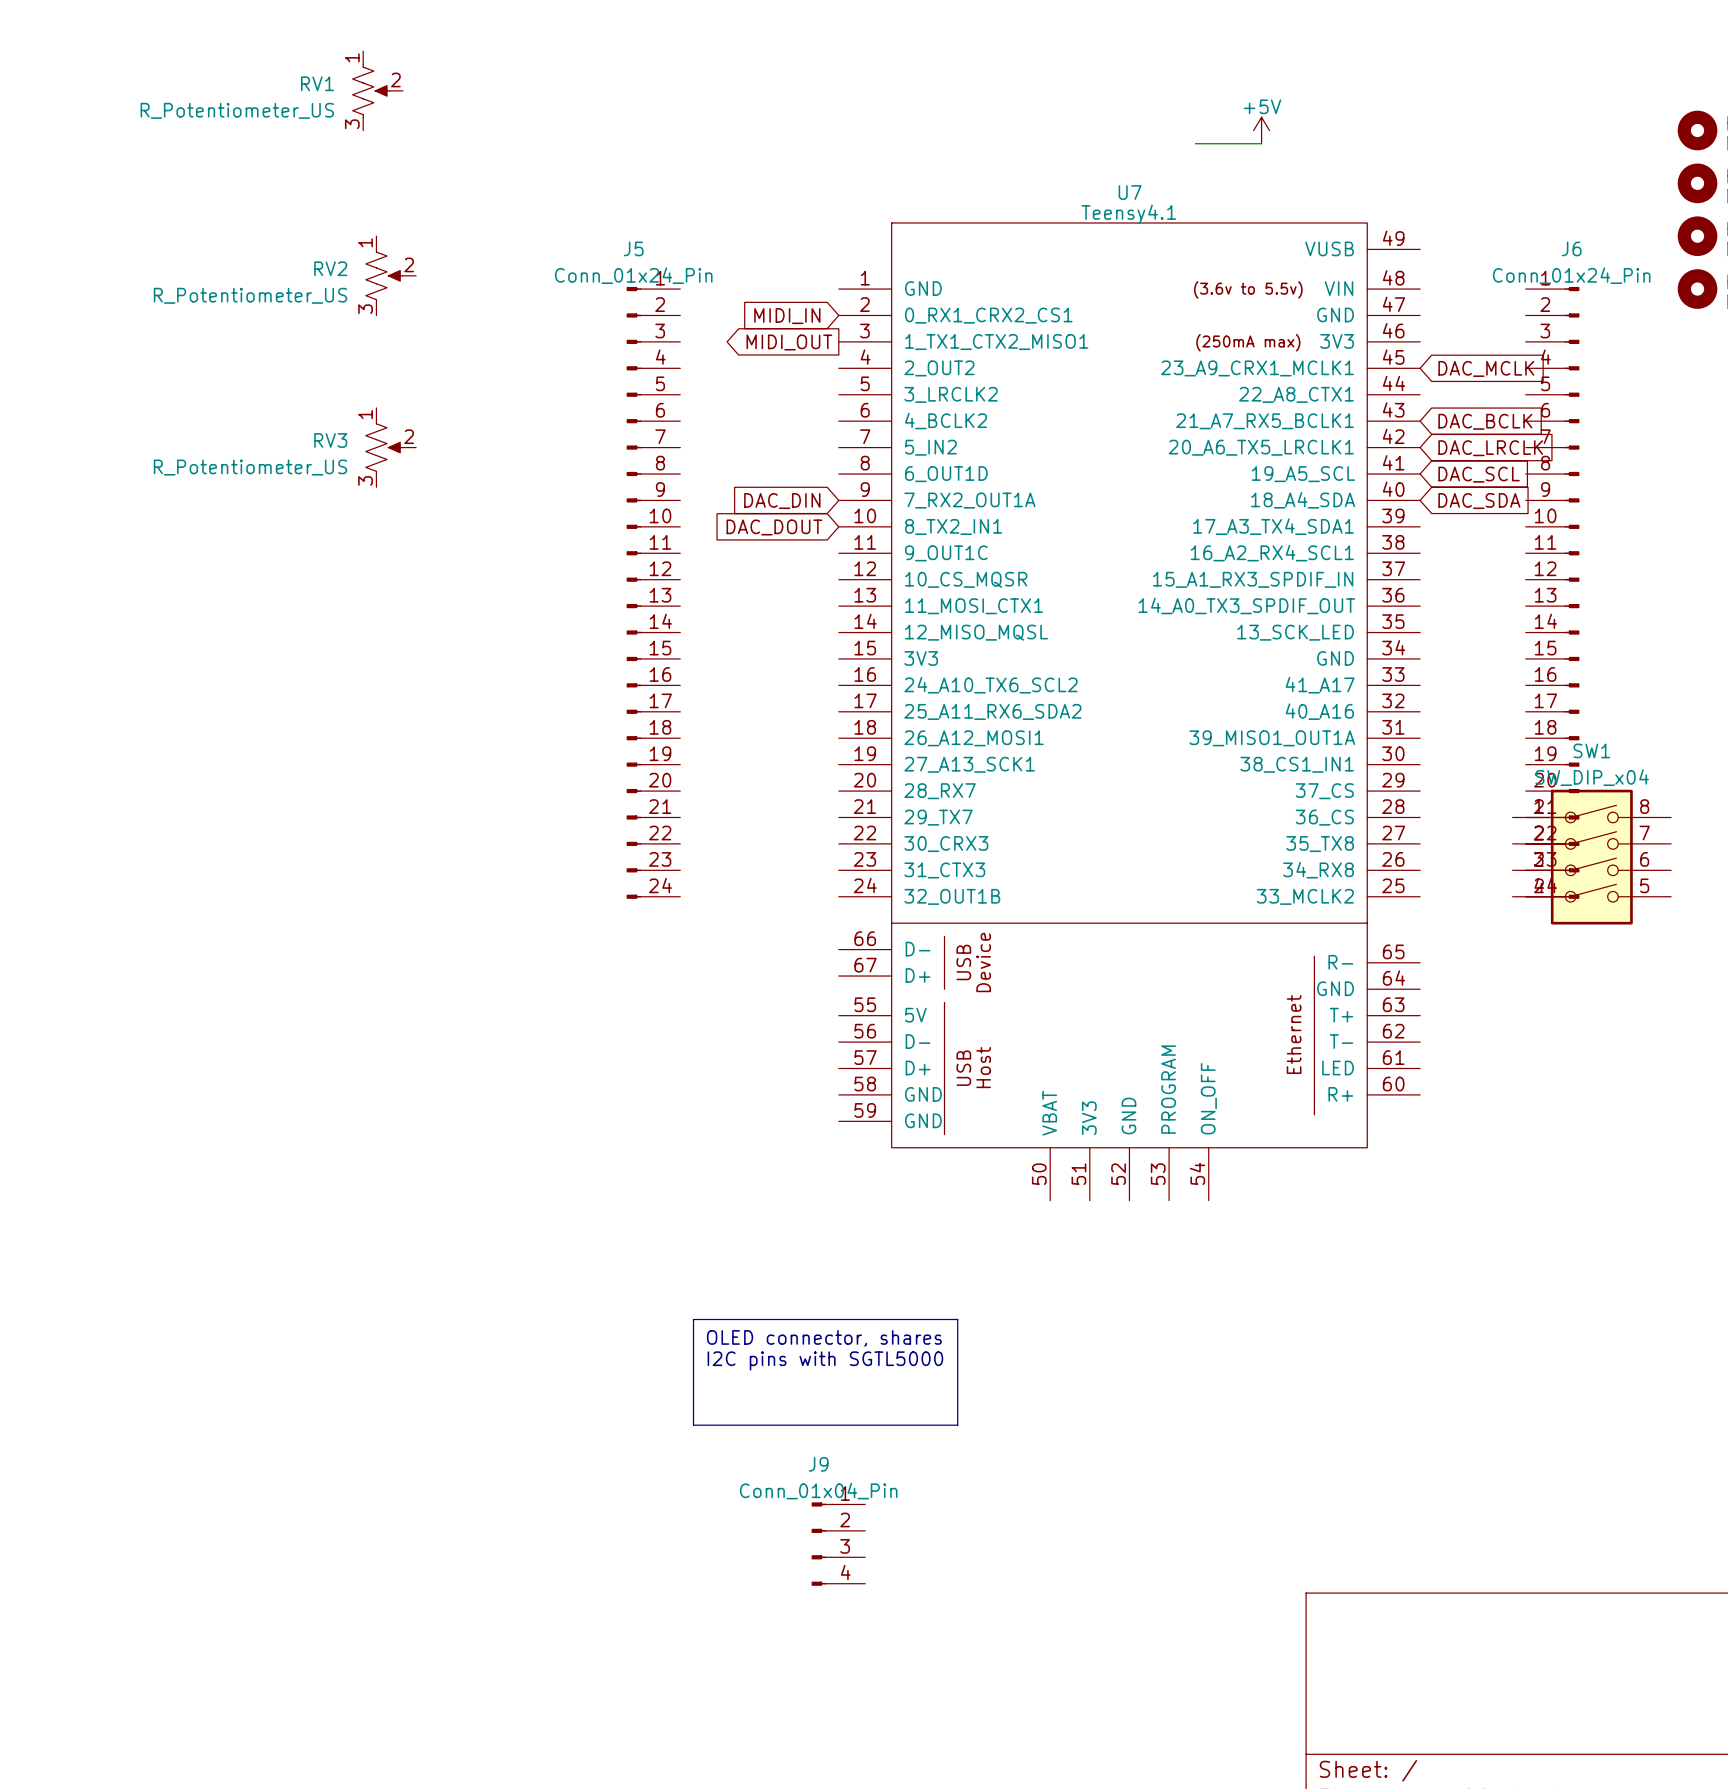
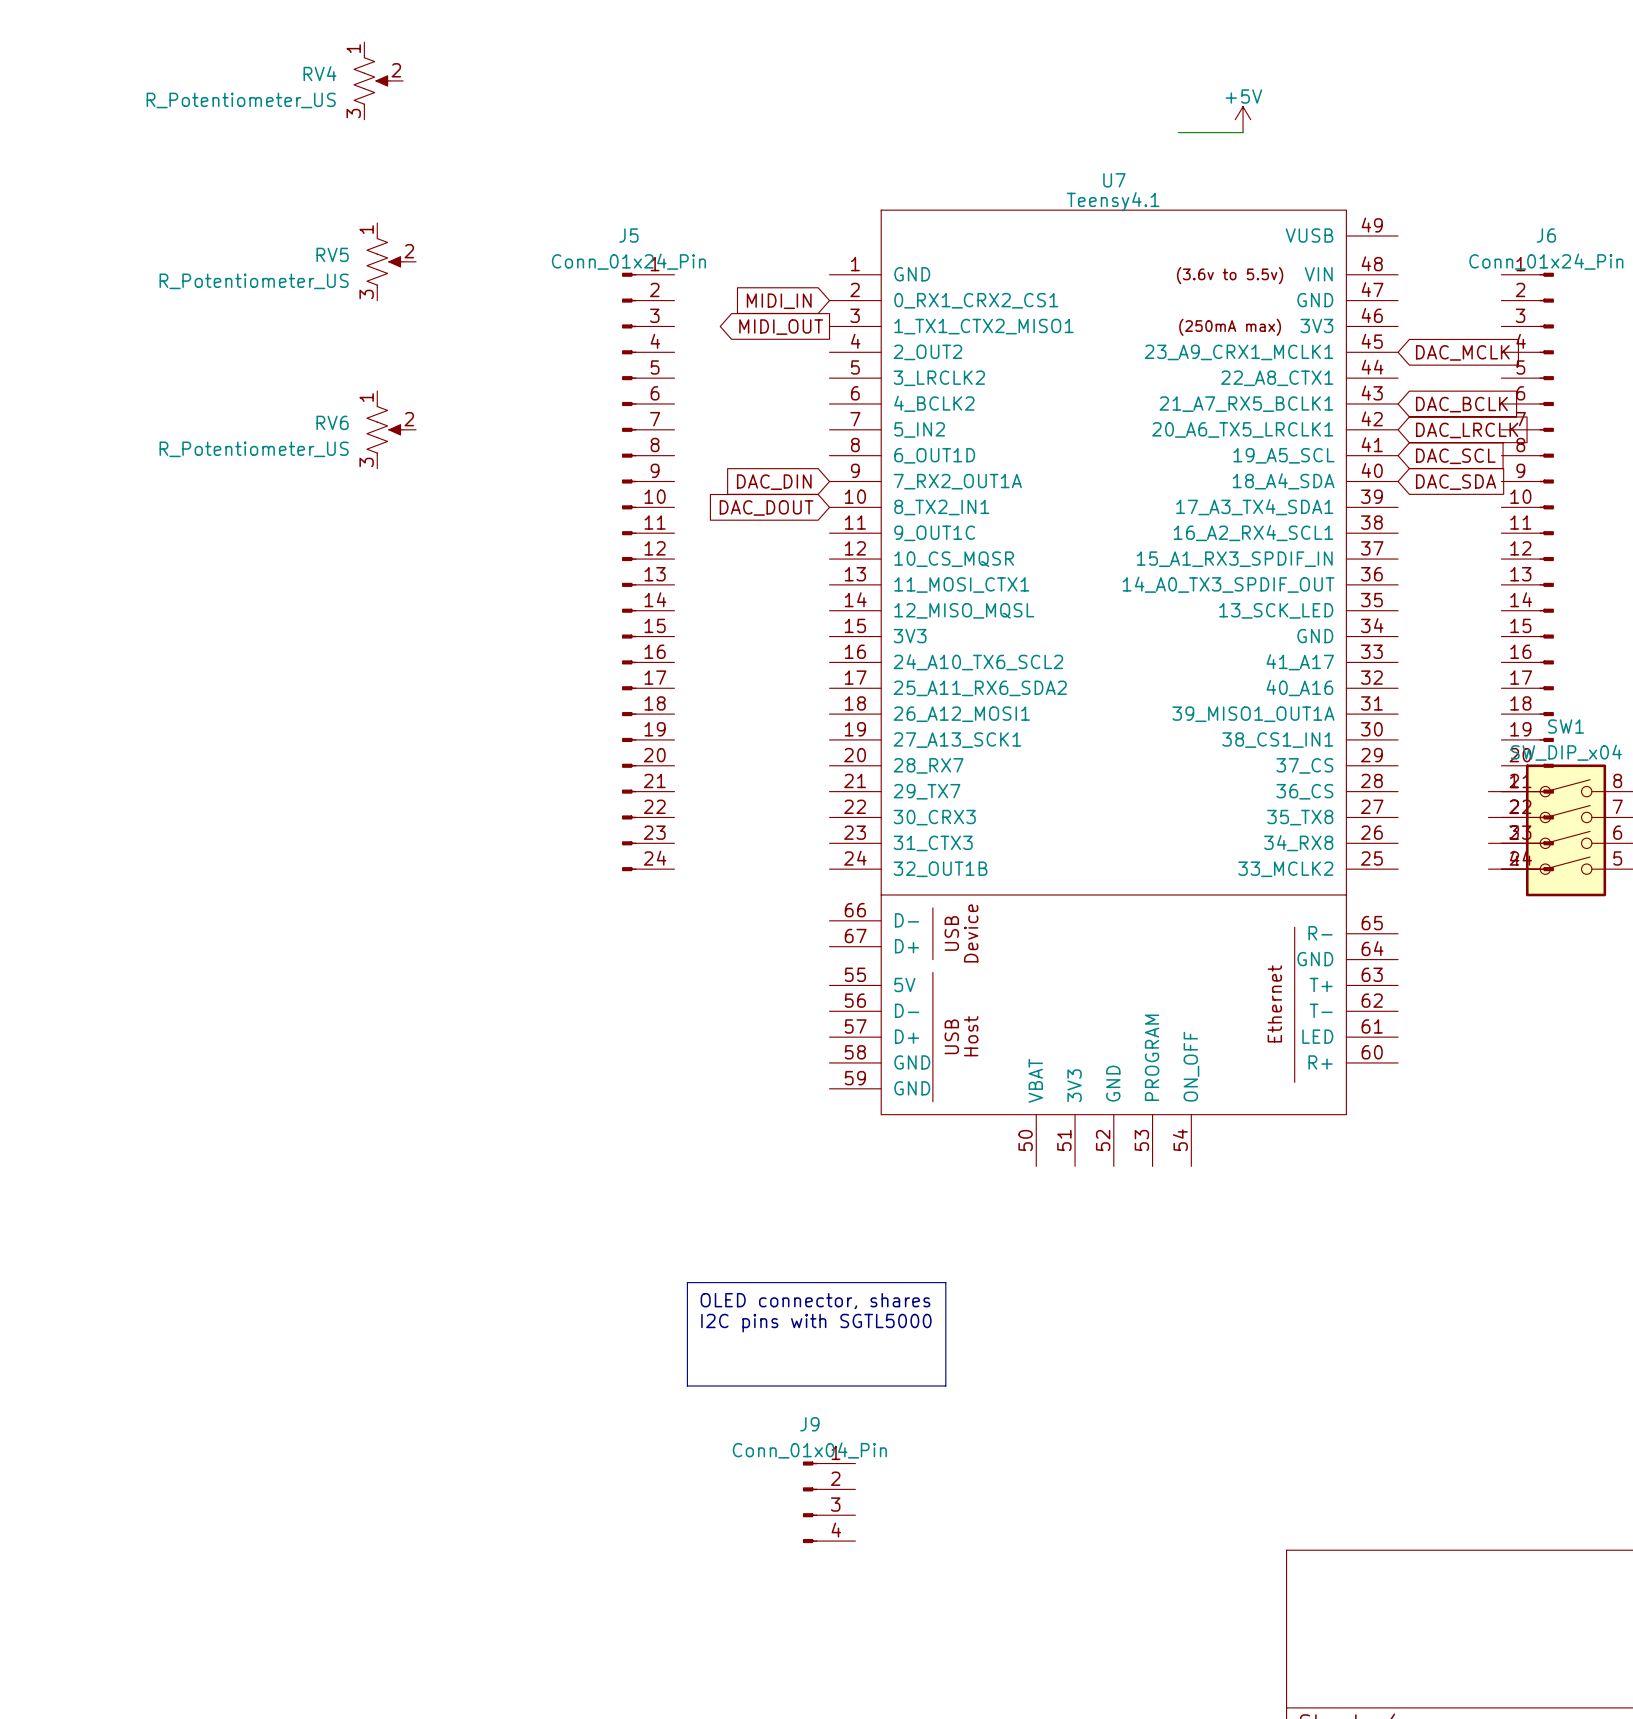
RV1 name: RV1 (317, 83) -> RV4 (319, 73)
RV2 name: RV2 (330, 268) -> RV5 (332, 254)
RV3 name: RV3 (330, 440) -> RV6 (332, 422)

